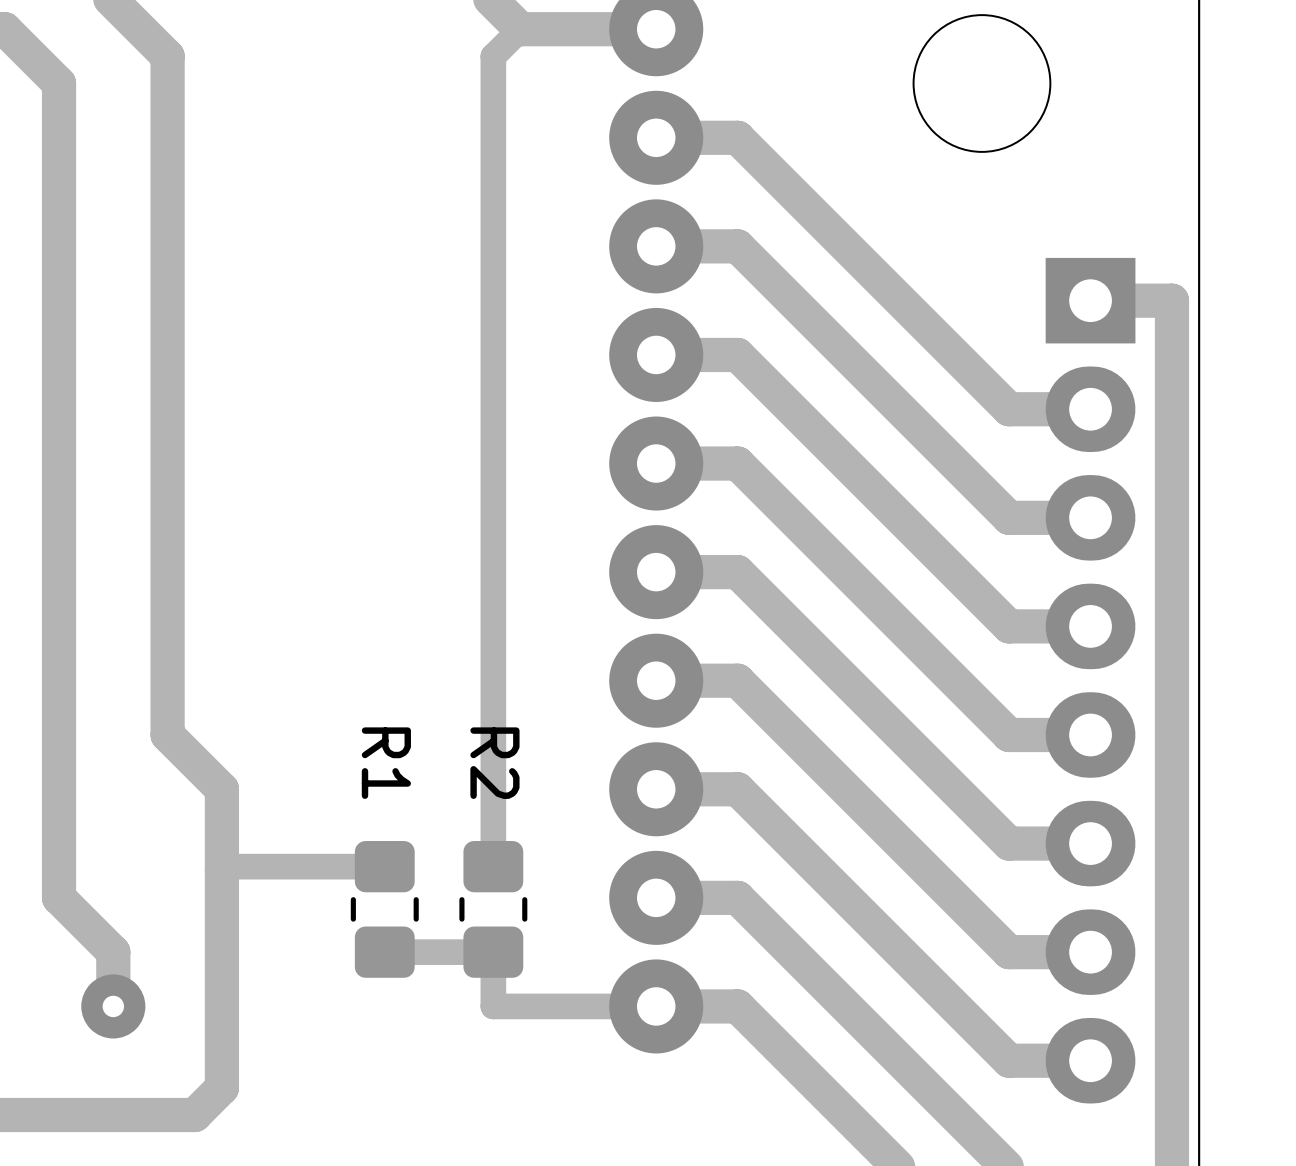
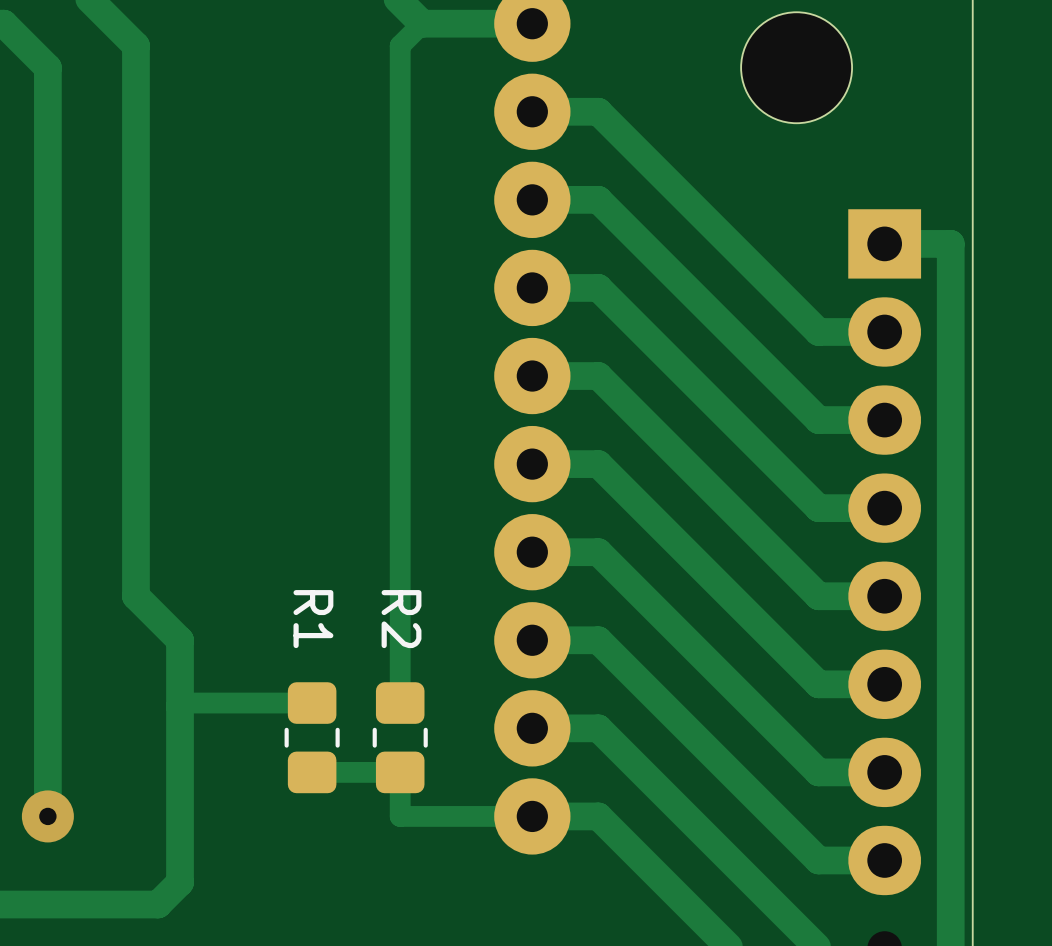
track: (59, 897) (113, 952) (113, 1006) -> (47, 728) (47, 816)
via position: (113, 1006) -> (47, 816)

